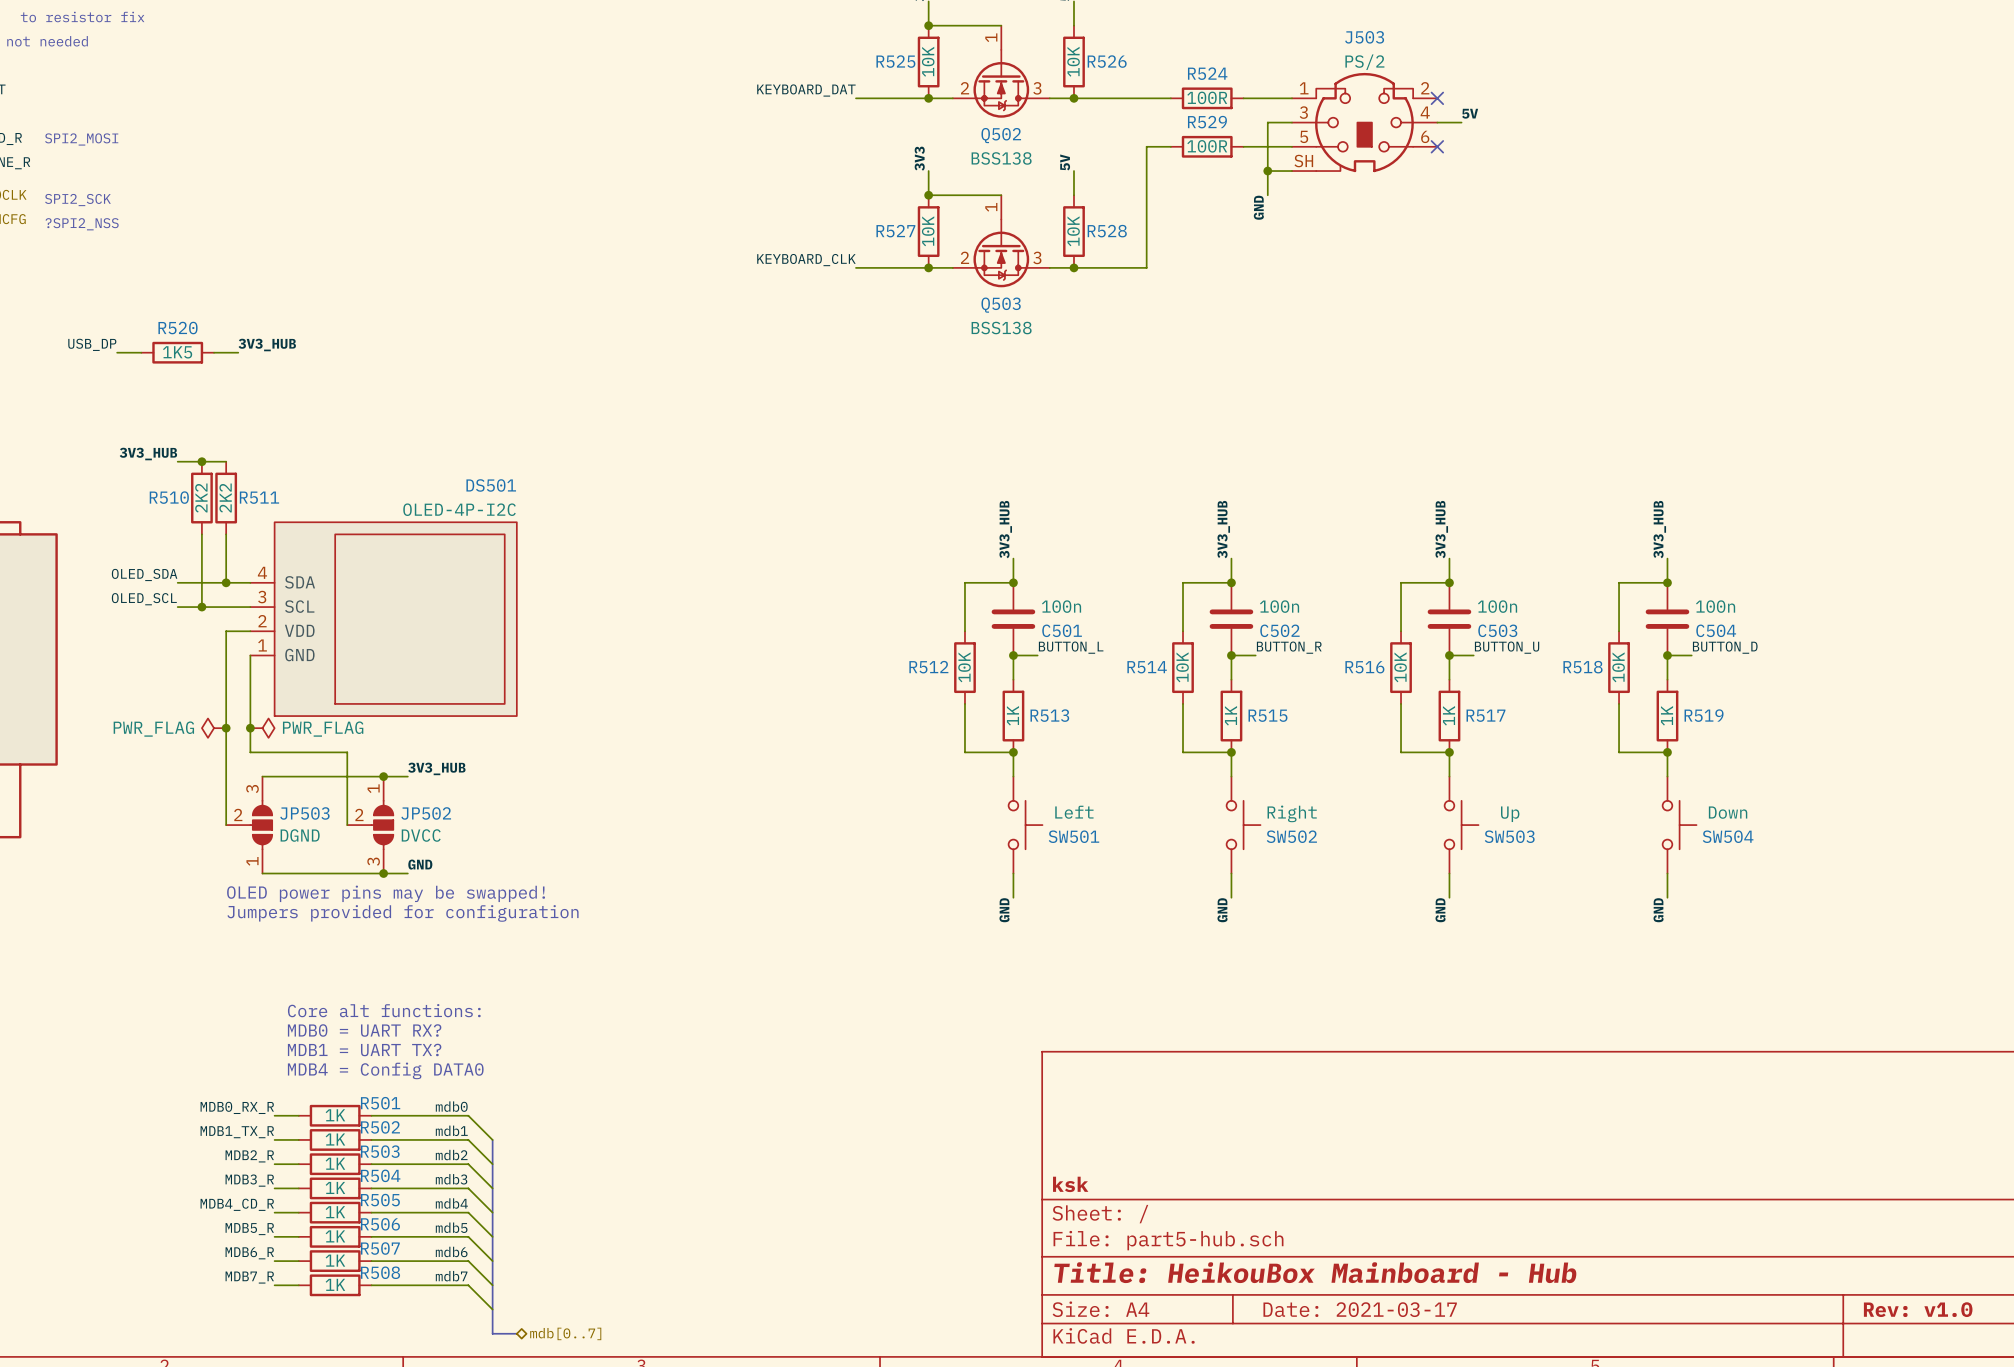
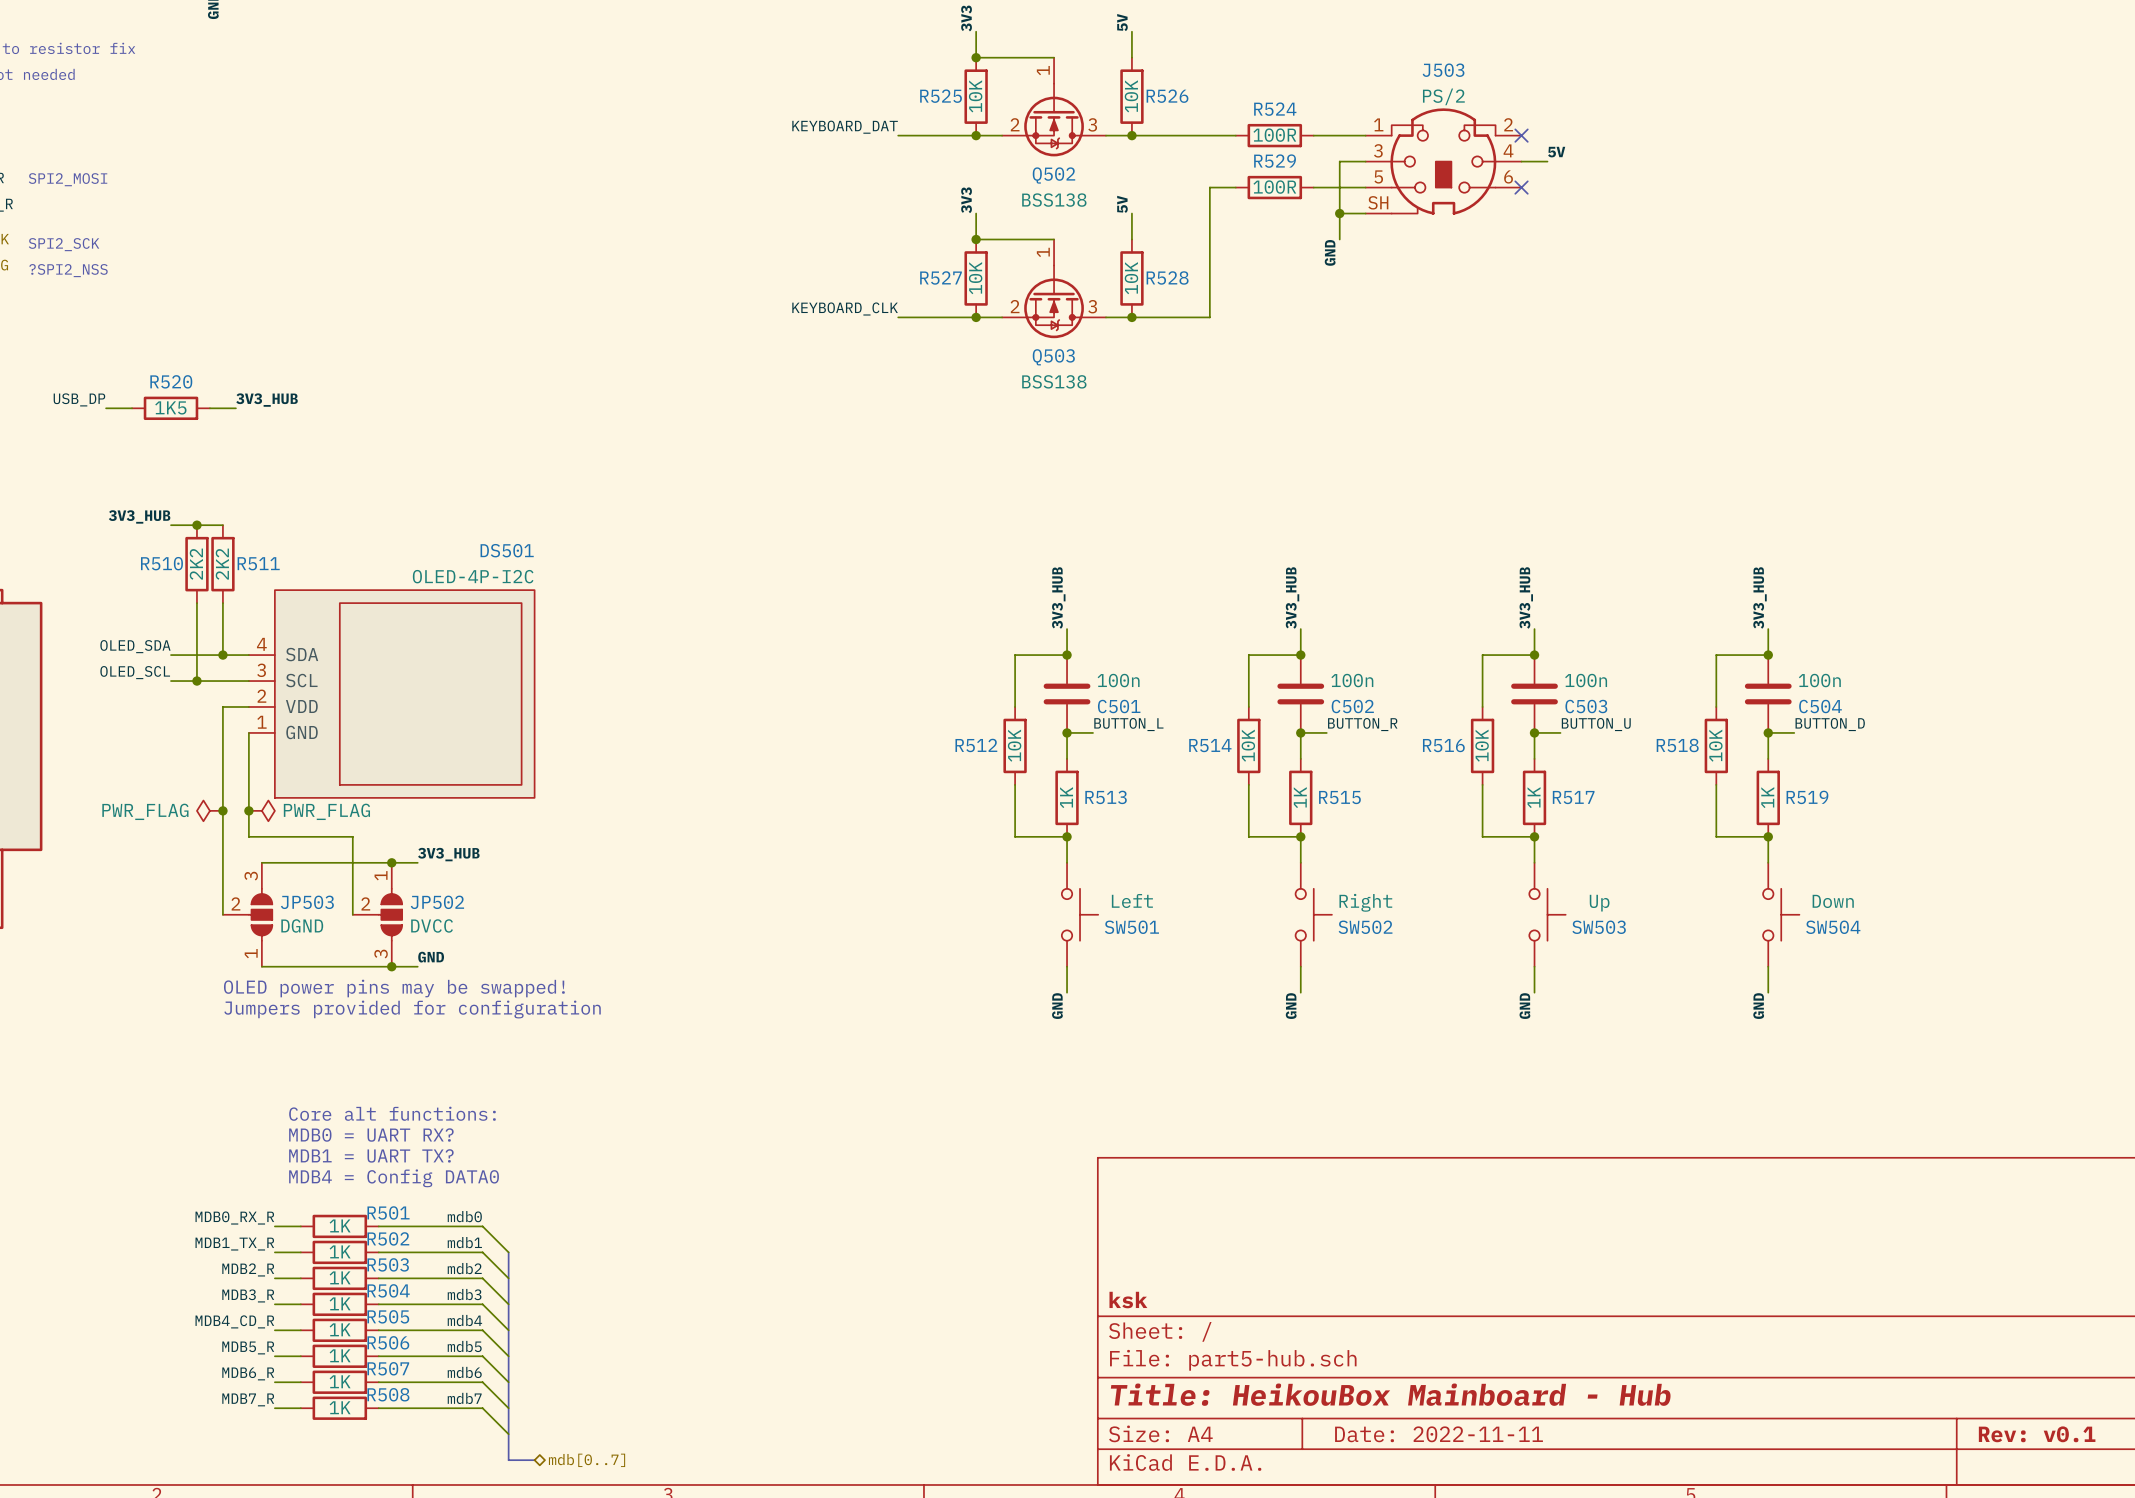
title block: Date: 2021-03-17 (1360, 1309) -> Date: 2022-11-11 (1439, 1434)
title block: Rev: v1.0 (1918, 1309) -> Rev: v0.1 (2037, 1434)

